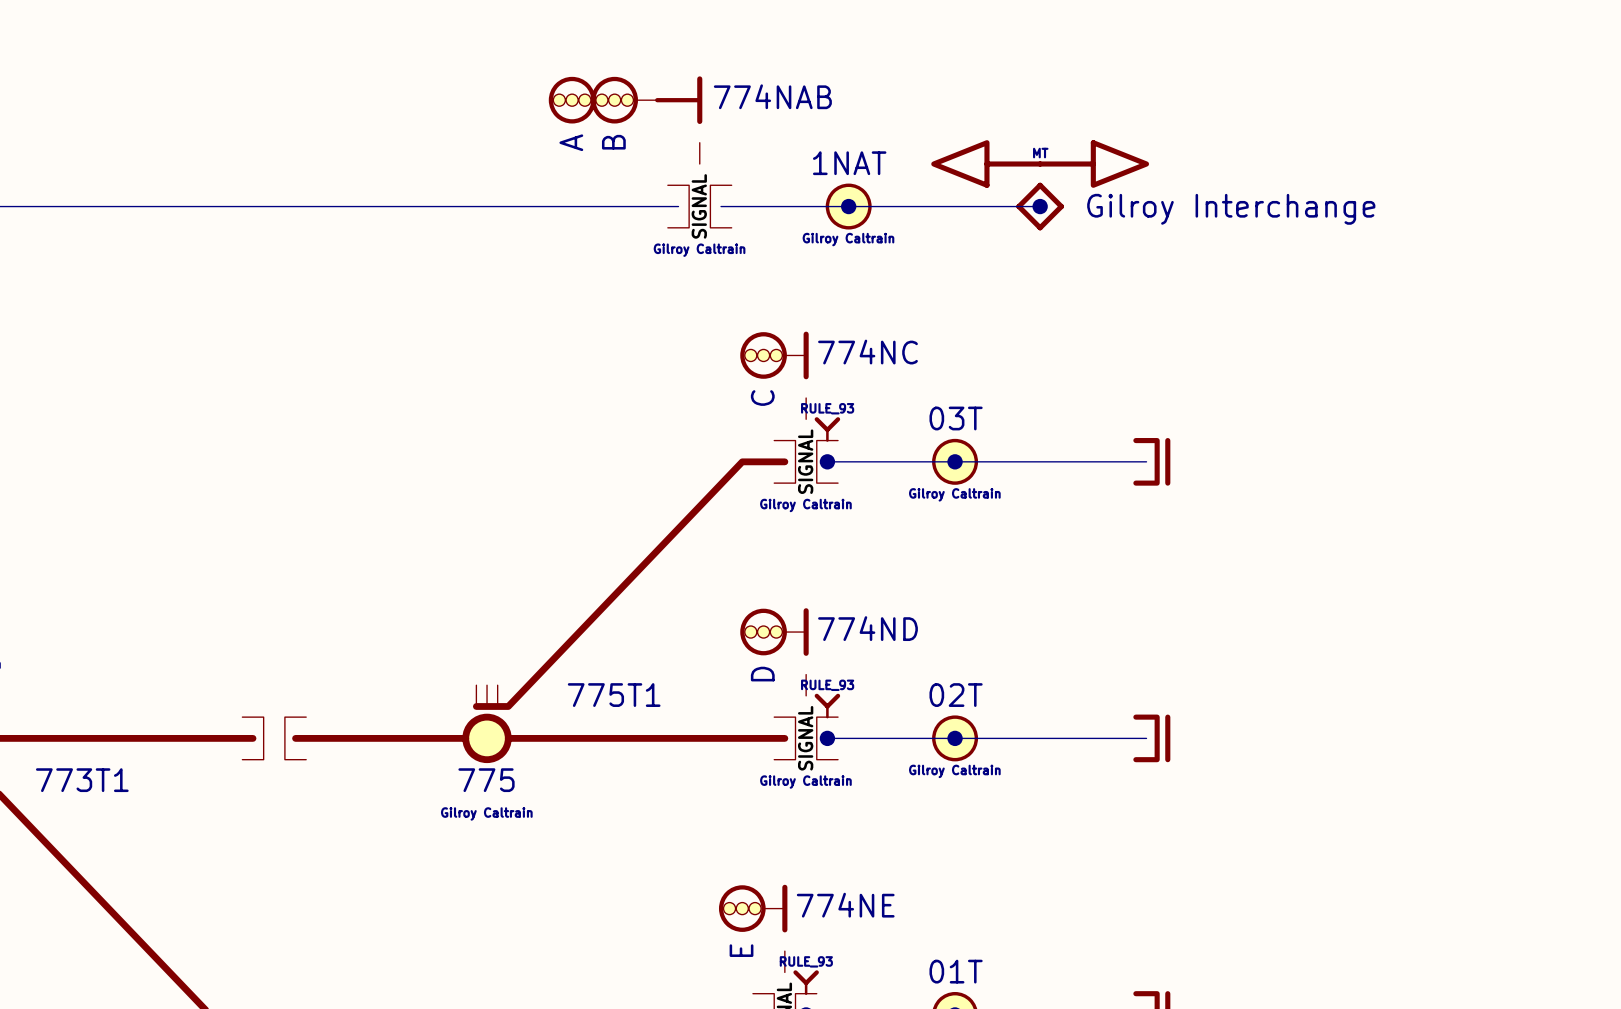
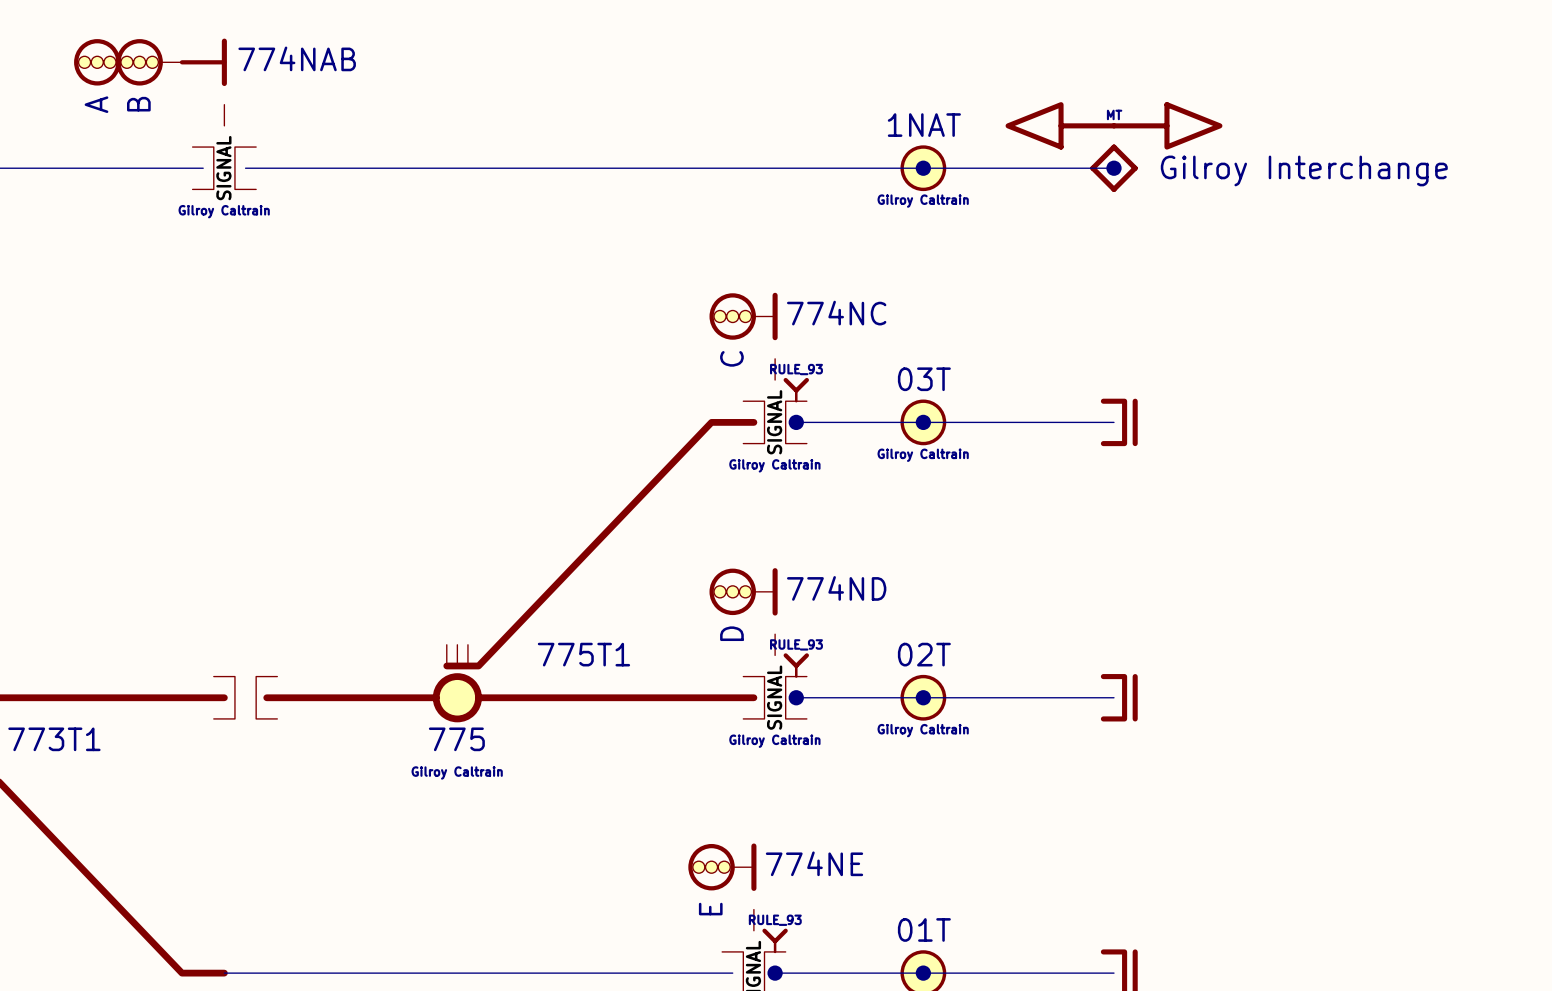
part: none -> A (97, 62)
part: none -> B (139, 62)
part: none -> 774NAB (193, 62)
part: A (572, 100) -> none
part: B (614, 100) -> none
part: 774NAB (669, 100) -> none
part position: (1040, 164) -> (1113, 125)
part: none -> (224, 147)
part: (699, 185) -> none
wire: (231, 206) (274, 206) -> none
wire: none -> (648, 168) (690, 168)
junction: (848, 206) -> none
part position: (848, 206) -> (923, 168)
junction: none -> (923, 168)
wire: none -> (1008, 168) (1113, 168)
junction: (1040, 206) -> none
part position: (1040, 206) -> (1113, 168)
junction: none -> (1113, 168)

